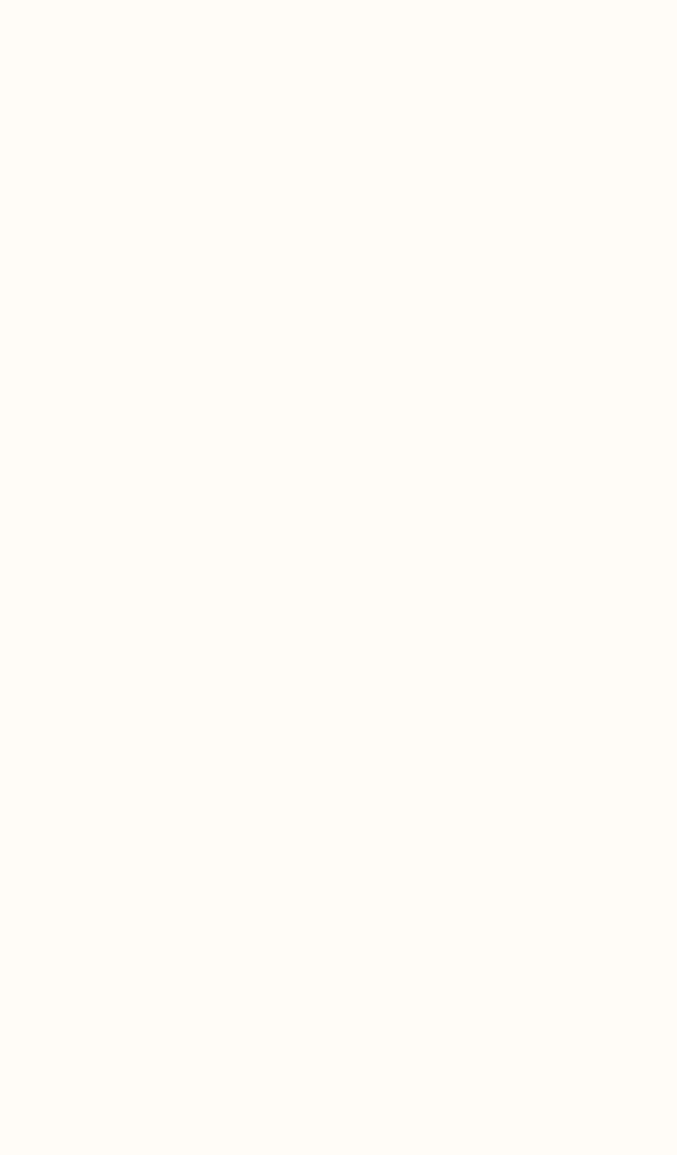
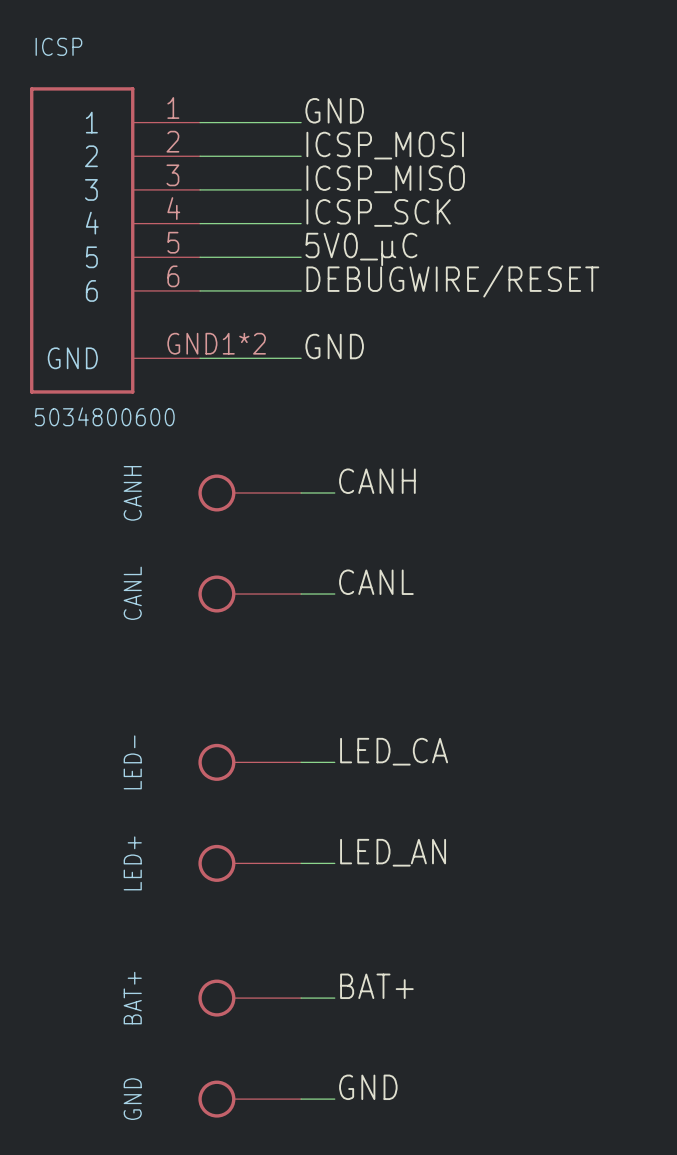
label: none -> GND (334, 110)
wire: none -> (200, 122) (301, 122)
label: none -> ICSP_MOSI (385, 145)
wire: none -> (200, 156) (301, 156)
label: none -> ICSP_MISO (385, 179)
wire: none -> (200, 189) (301, 189)
label: none -> ICSP_SCK (378, 212)
wire: none -> (200, 223) (301, 223)
ICSP: none -> 5034800600 (115, 240)
label: none -> 5V0_μC (361, 249)
wire: none -> (200, 257) (301, 257)
label: none -> DEBUGWIRE/RESET (452, 281)
wire: none -> (200, 290) (301, 290)
label: none -> GND (334, 346)
wire: none -> (200, 358) (301, 358)
label: none -> CANH (377, 481)
CANH: none -> (249, 492)
wire: none -> (301, 492) (334, 492)
label: none -> CANL (376, 582)
CANL: none -> (249, 594)
wire: none -> (301, 594) (334, 594)
label: none -> LED_CA (394, 751)
LED-: none -> (249, 762)
wire: none -> (301, 762) (334, 762)
label: none -> LED_AN (393, 852)
LED+: none -> (249, 863)
wire: none -> (301, 863) (334, 863)
label: none -> BAT+ (376, 986)
BAT+: none -> (249, 998)
wire: none -> (301, 998) (334, 998)
label: none -> GND (368, 1087)
GND: none -> (249, 1099)
wire: none -> (301, 1099) (334, 1099)

